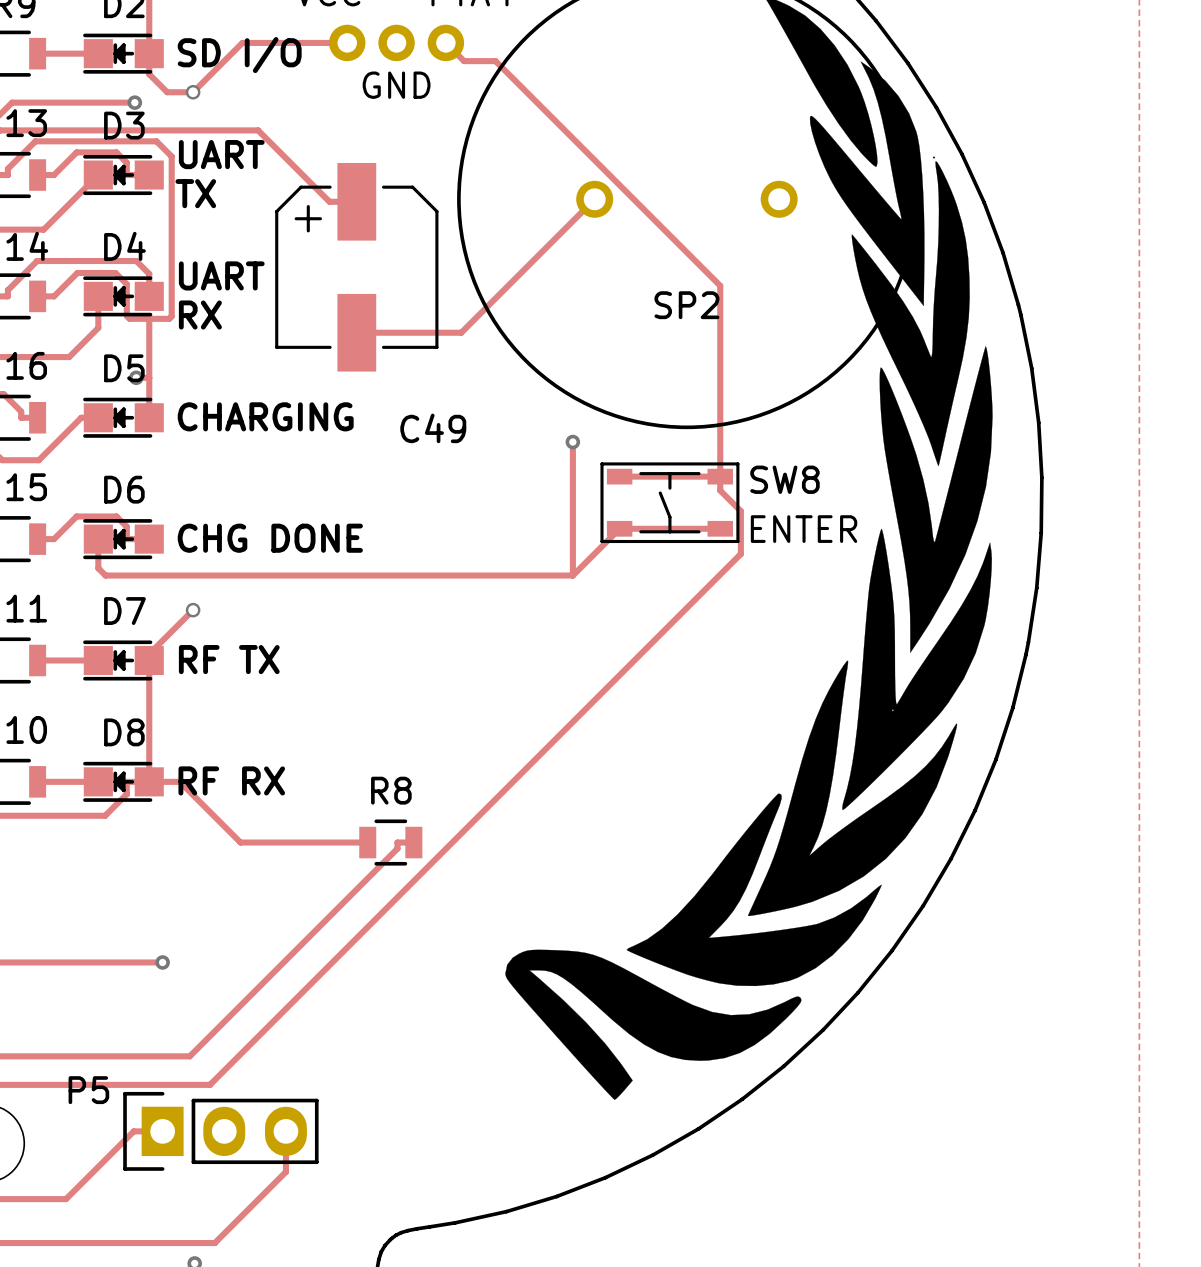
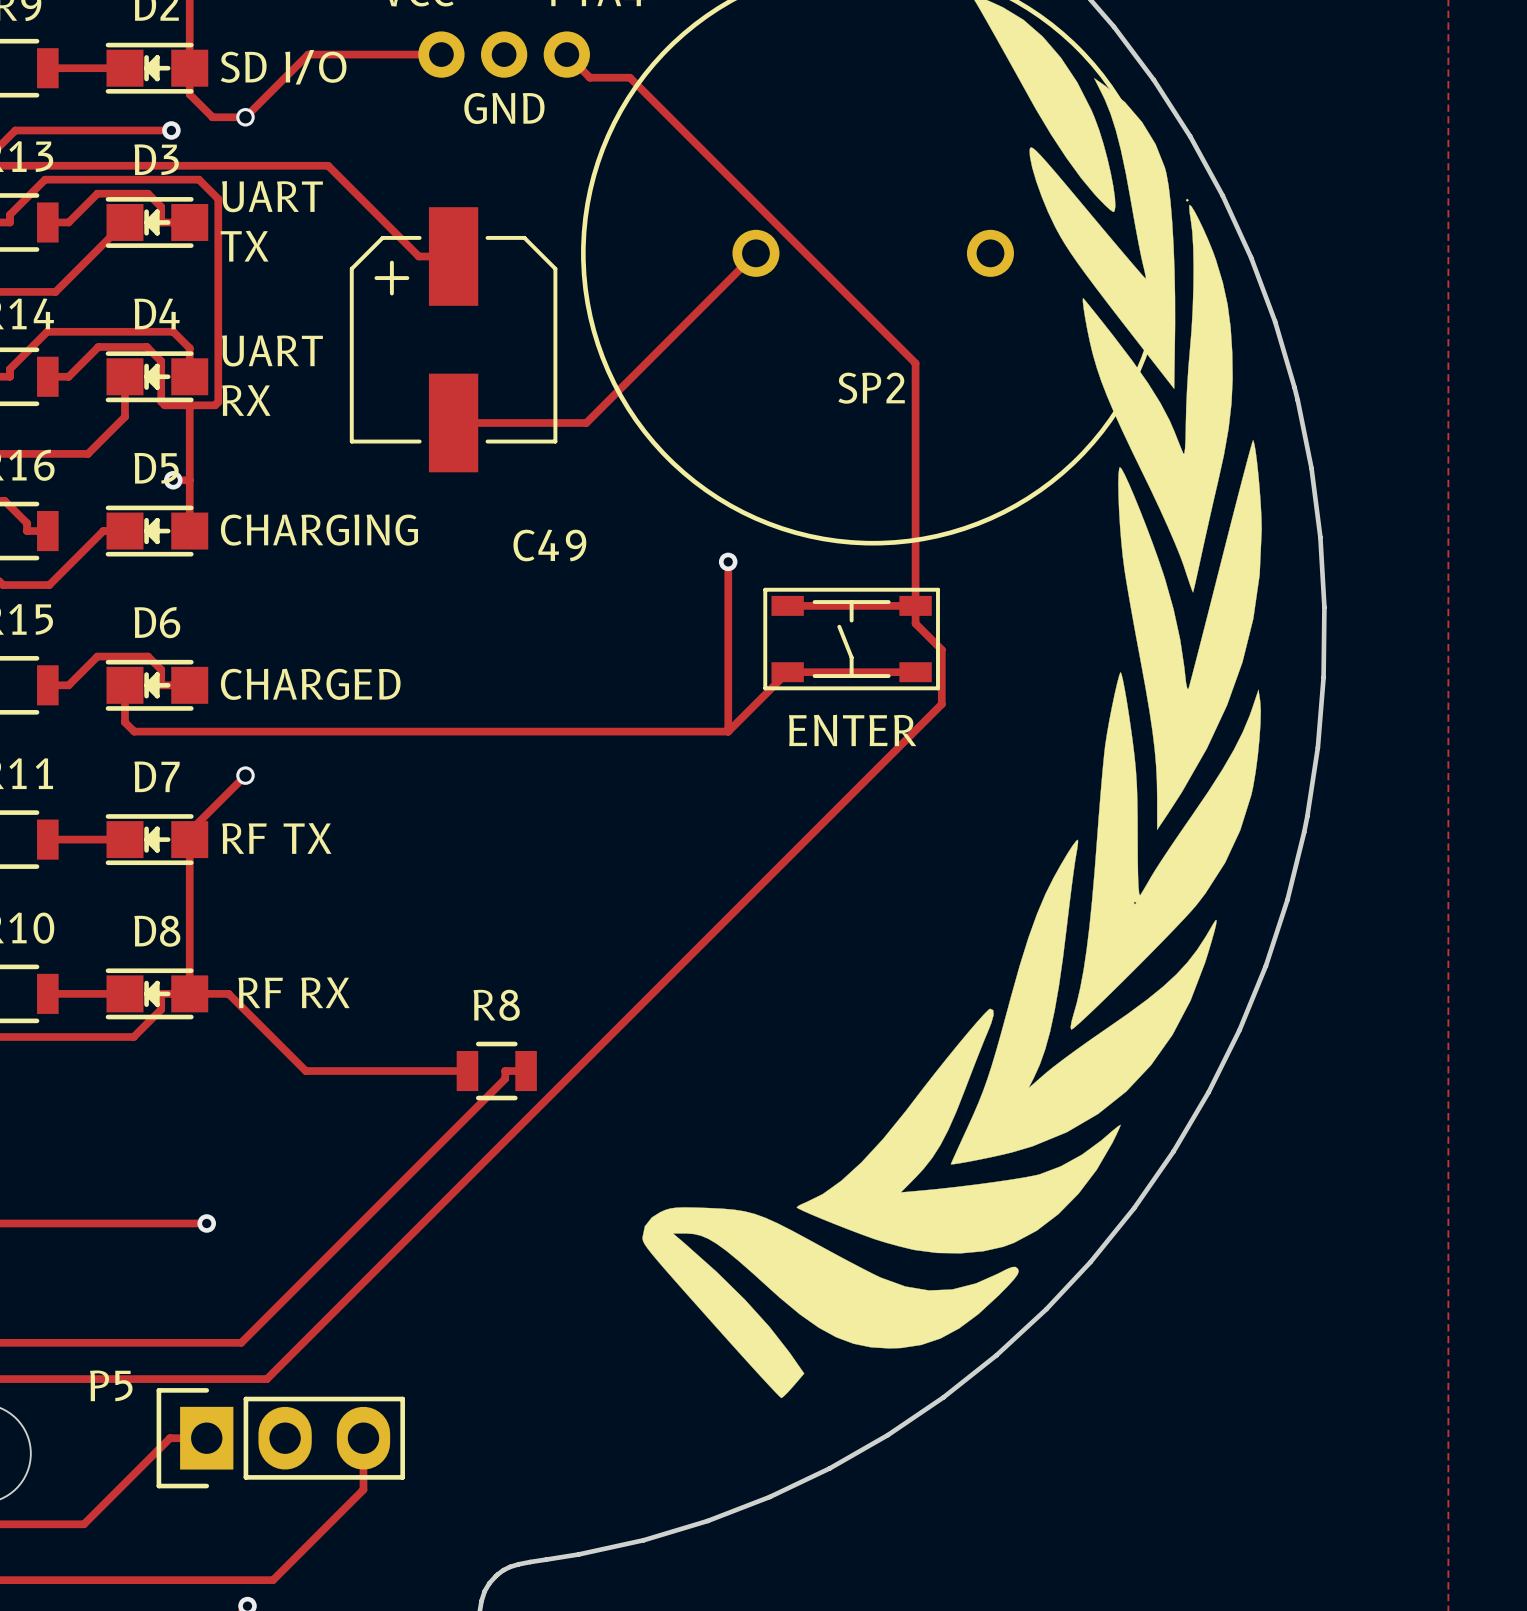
SW8 name: SW8 (785, 479) -> none
SW8 value position: ENTER (804, 529) -> ENTER (852, 730)
text: CHG DONE (270, 538) -> CHARGED (310, 684)

